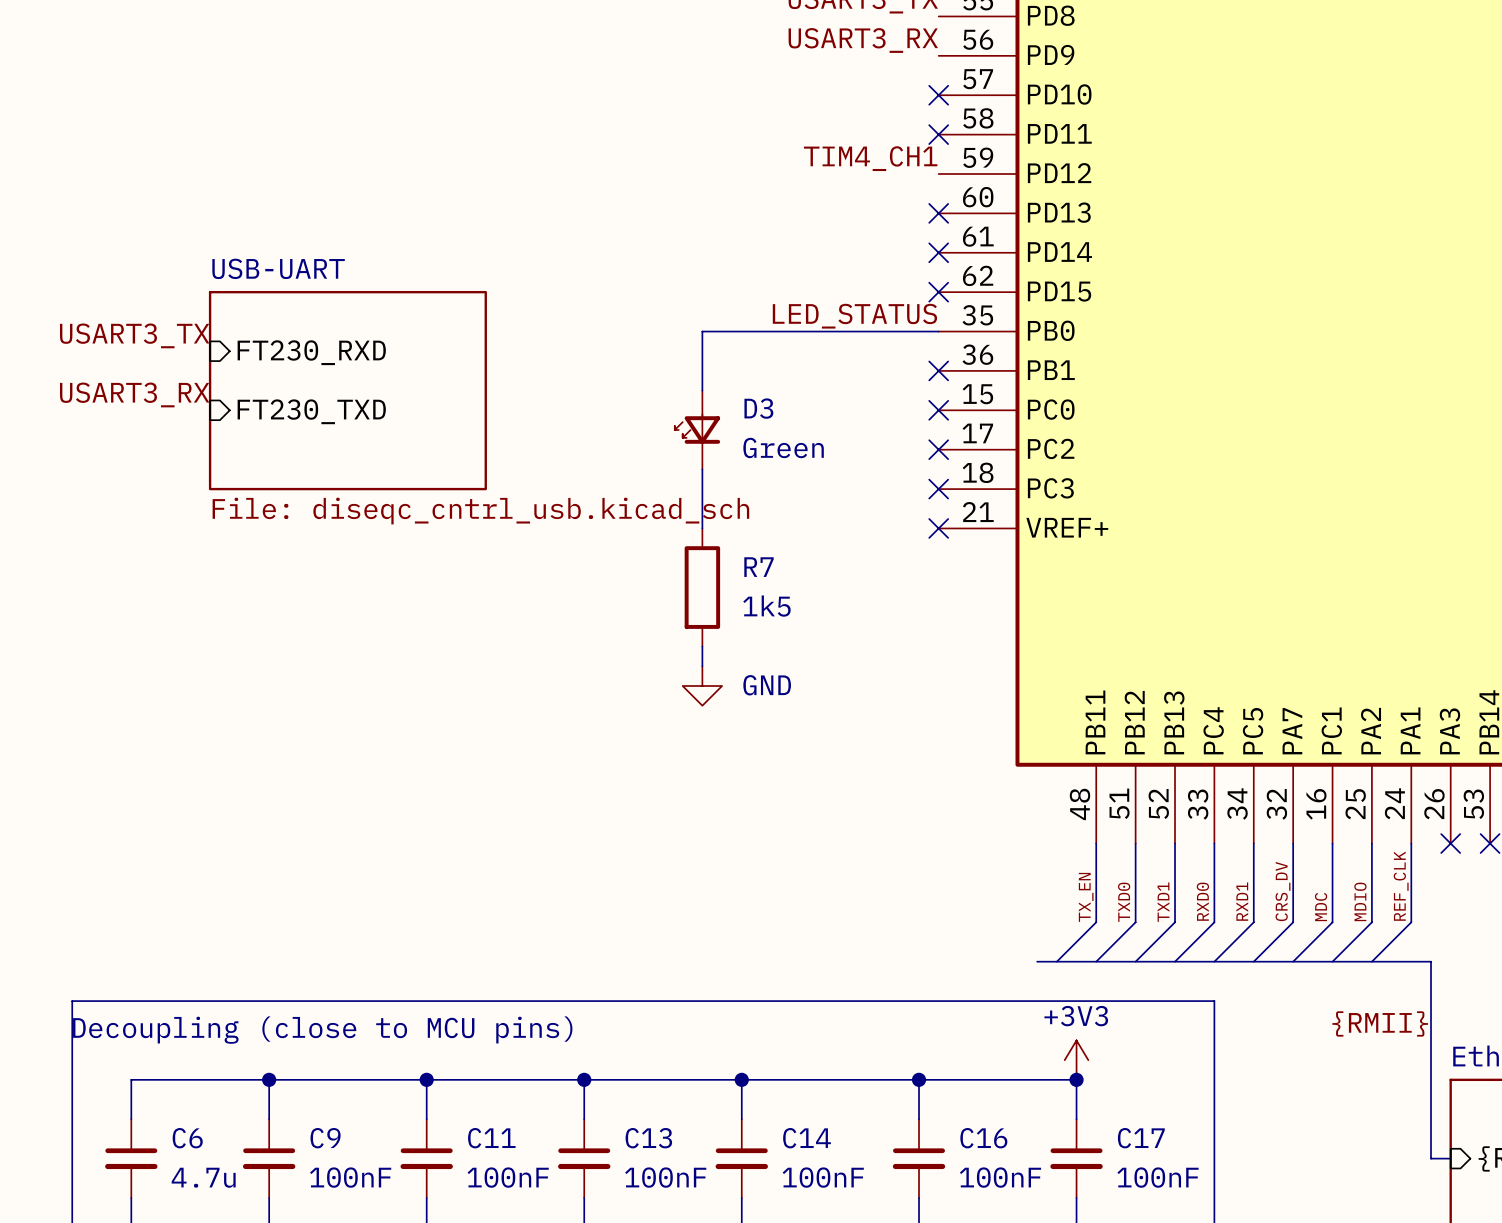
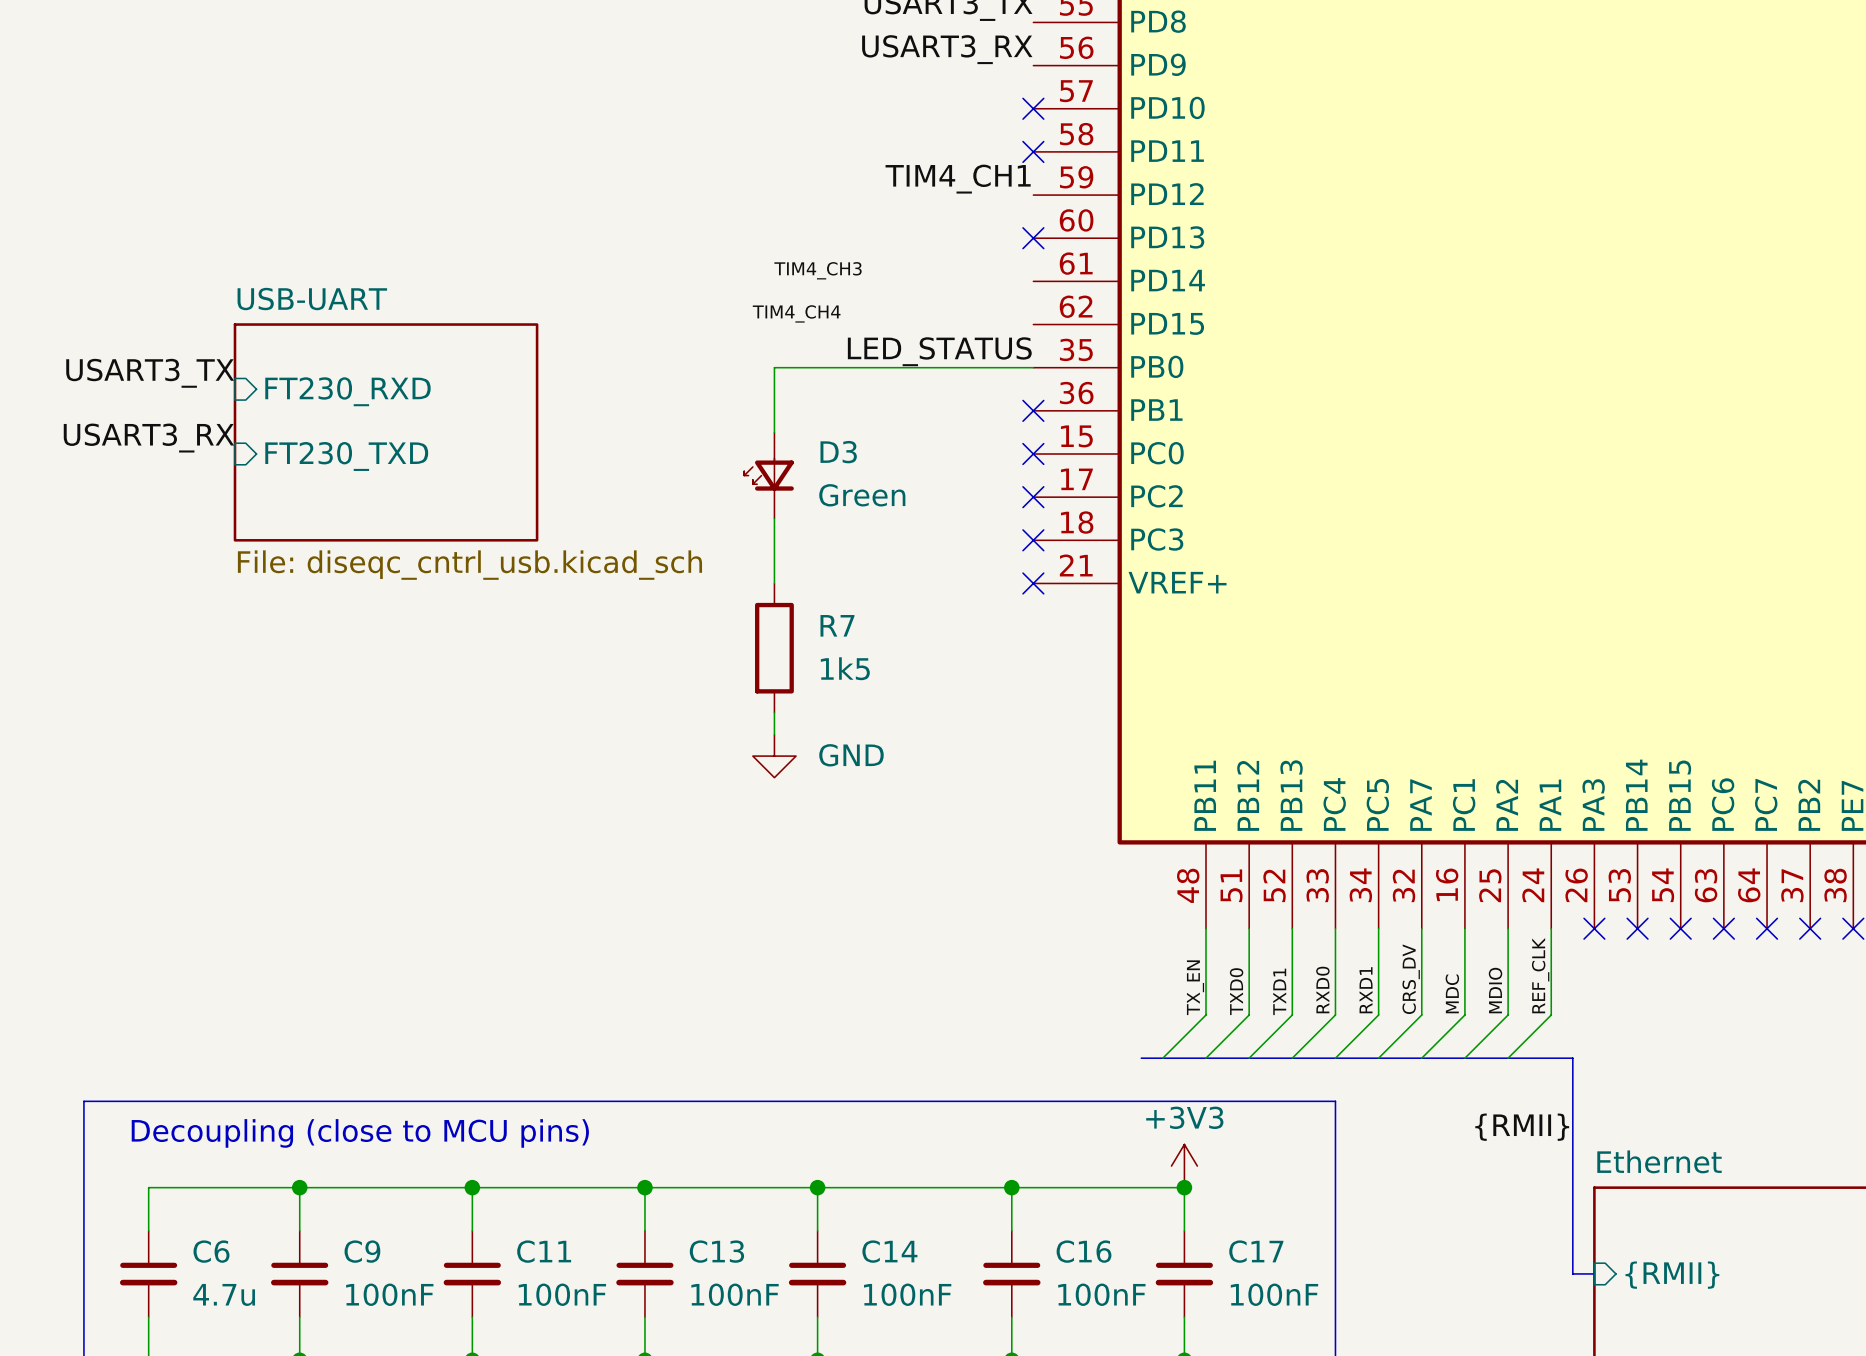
label: none -> TIM4_CH3 (818, 270)
no-connect mark: (938, 252) -> none
label: none -> TIM4_CH4 (796, 313)
no-connect mark: (938, 292) -> none

